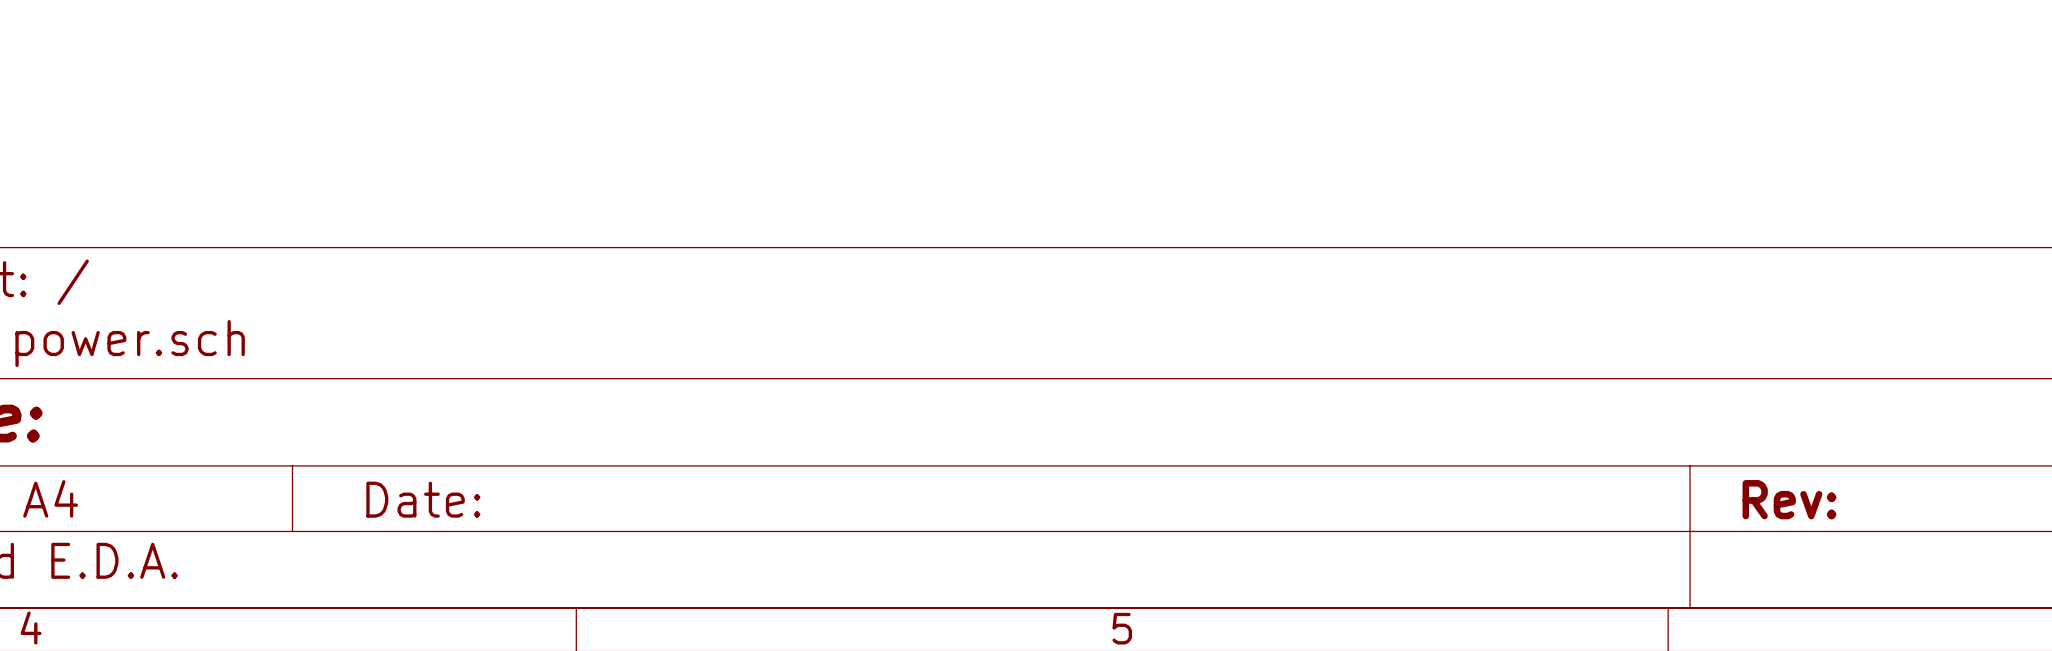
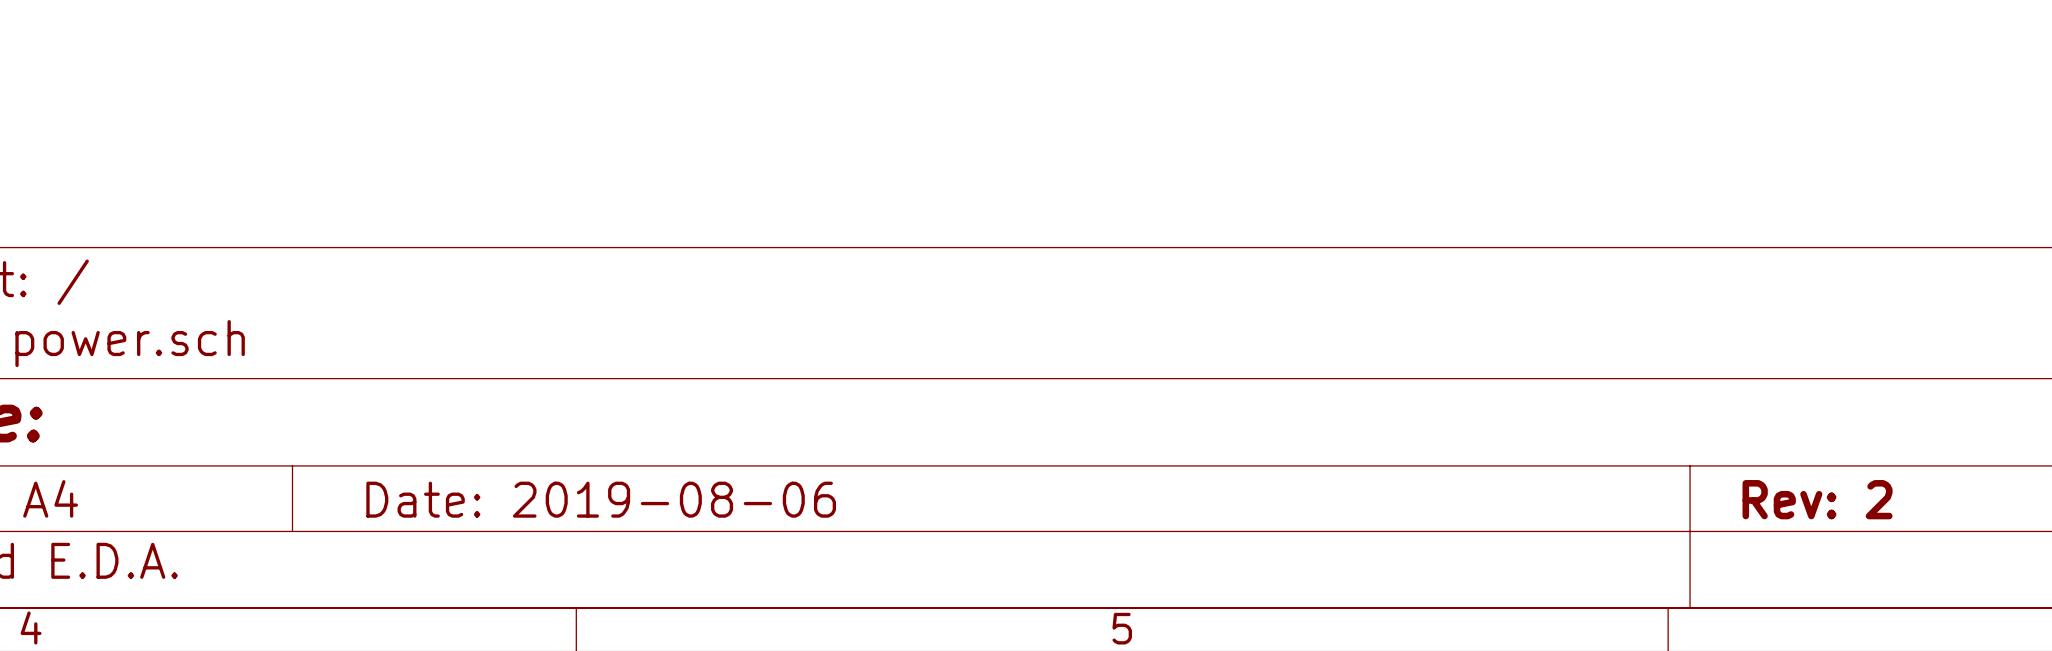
title block: Date: (423, 499) -> Date: 2019-08-06 (601, 499)
title block: Rev: (1789, 499) -> Rev: 2 (1817, 499)

